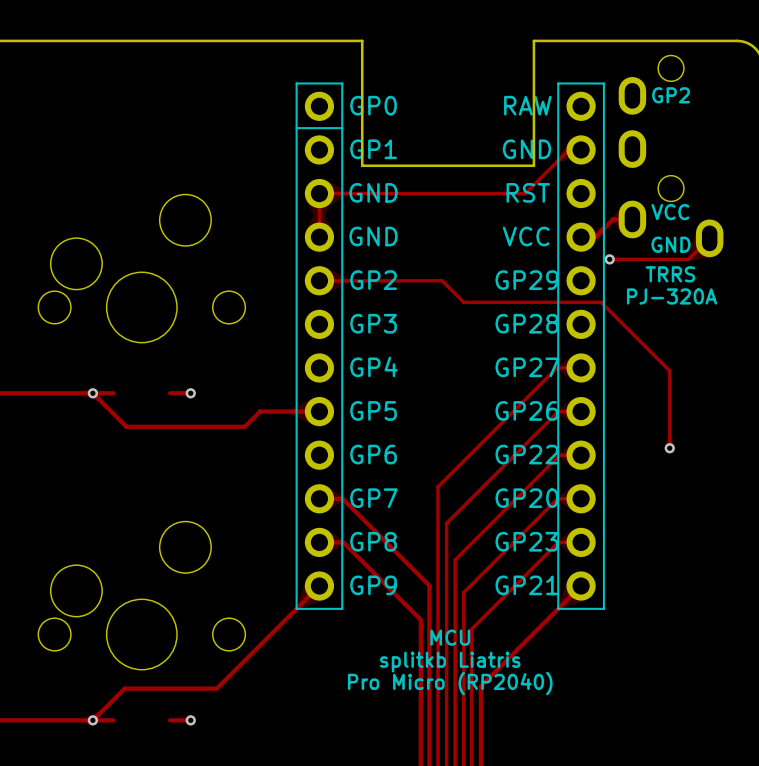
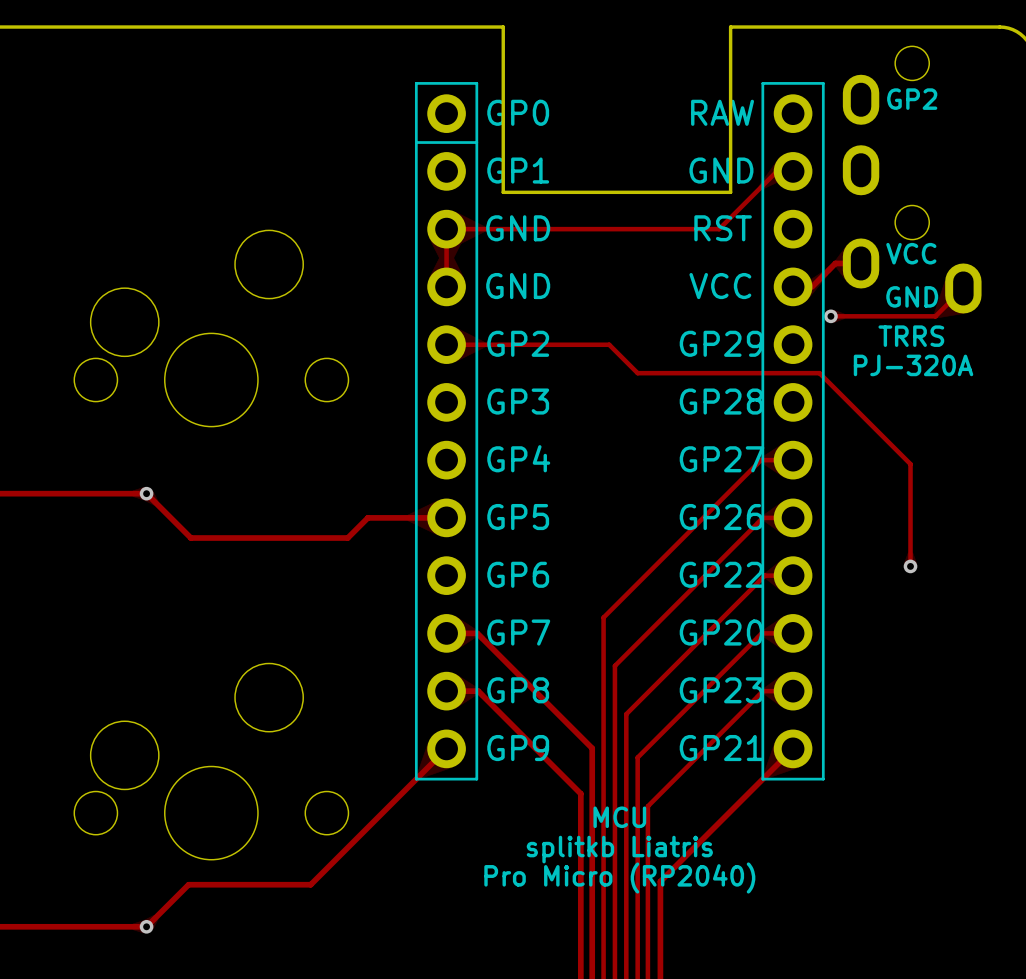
track: (92, 393) (113, 393) -> none
track: (170, 393) (190, 393) -> none
via: (190, 393) -> none
track: (92, 720) (113, 720) -> none
track: (170, 720) (190, 720) -> none
via: (190, 720) -> none

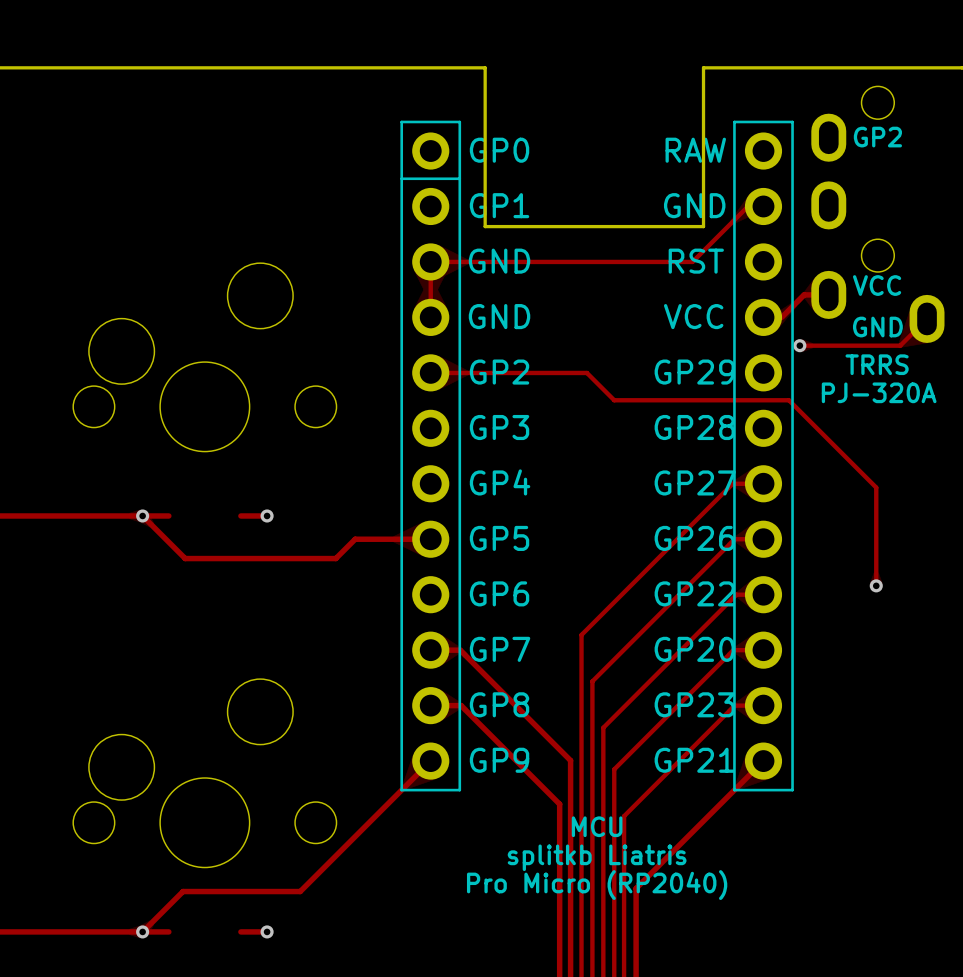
track: none -> (142, 515) (168, 515)
track: none -> (240, 515) (267, 515)
via: none -> (267, 515)
track: none -> (142, 931) (168, 931)
track: none -> (240, 931) (267, 931)
via: none -> (267, 931)

